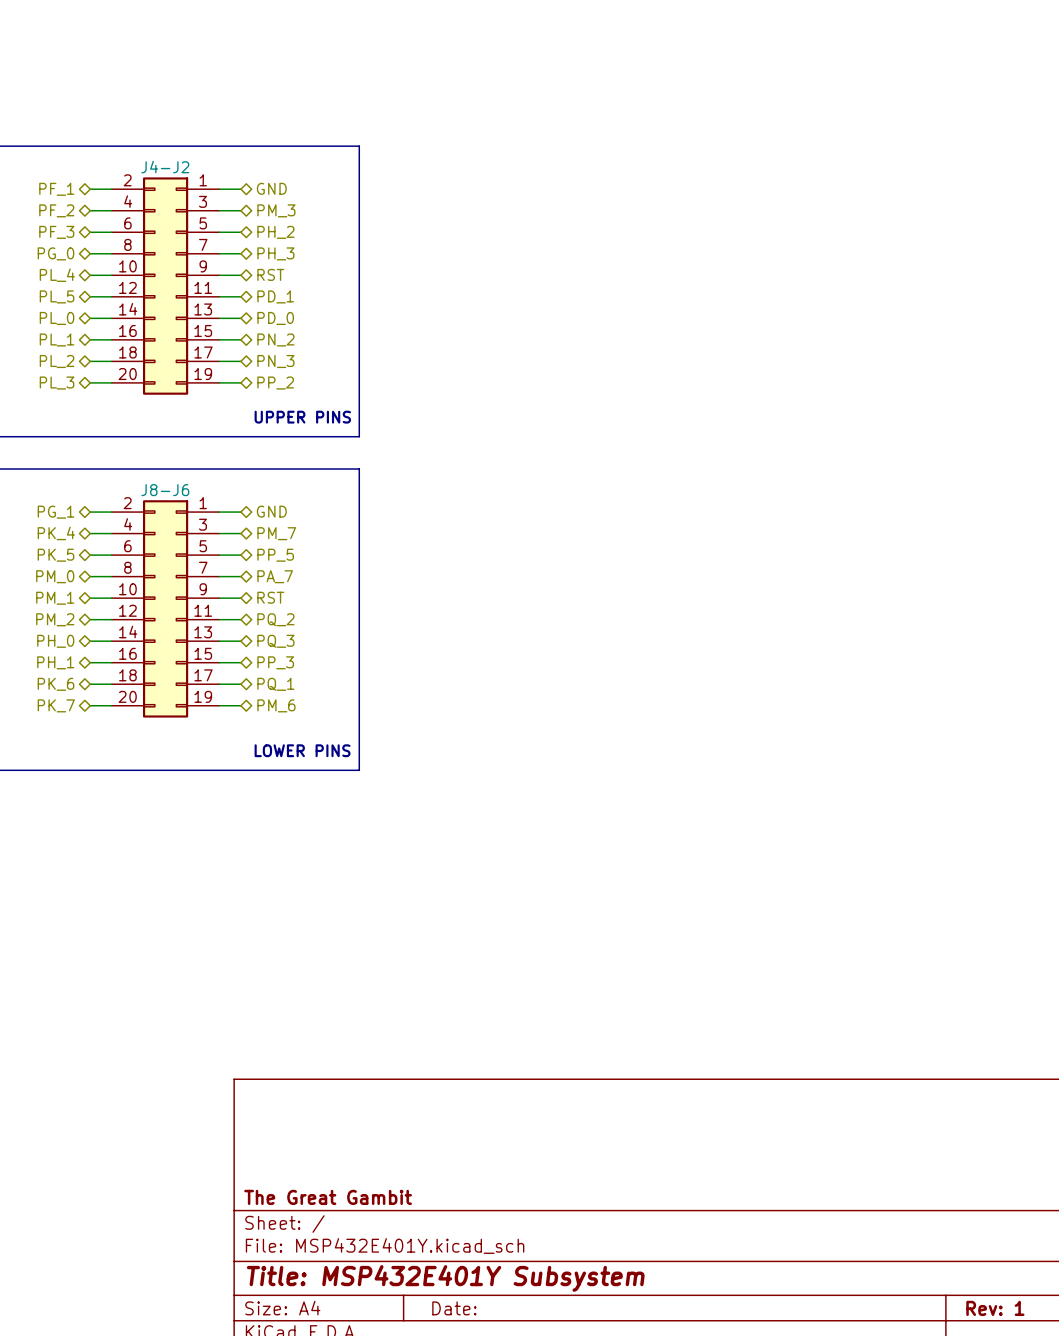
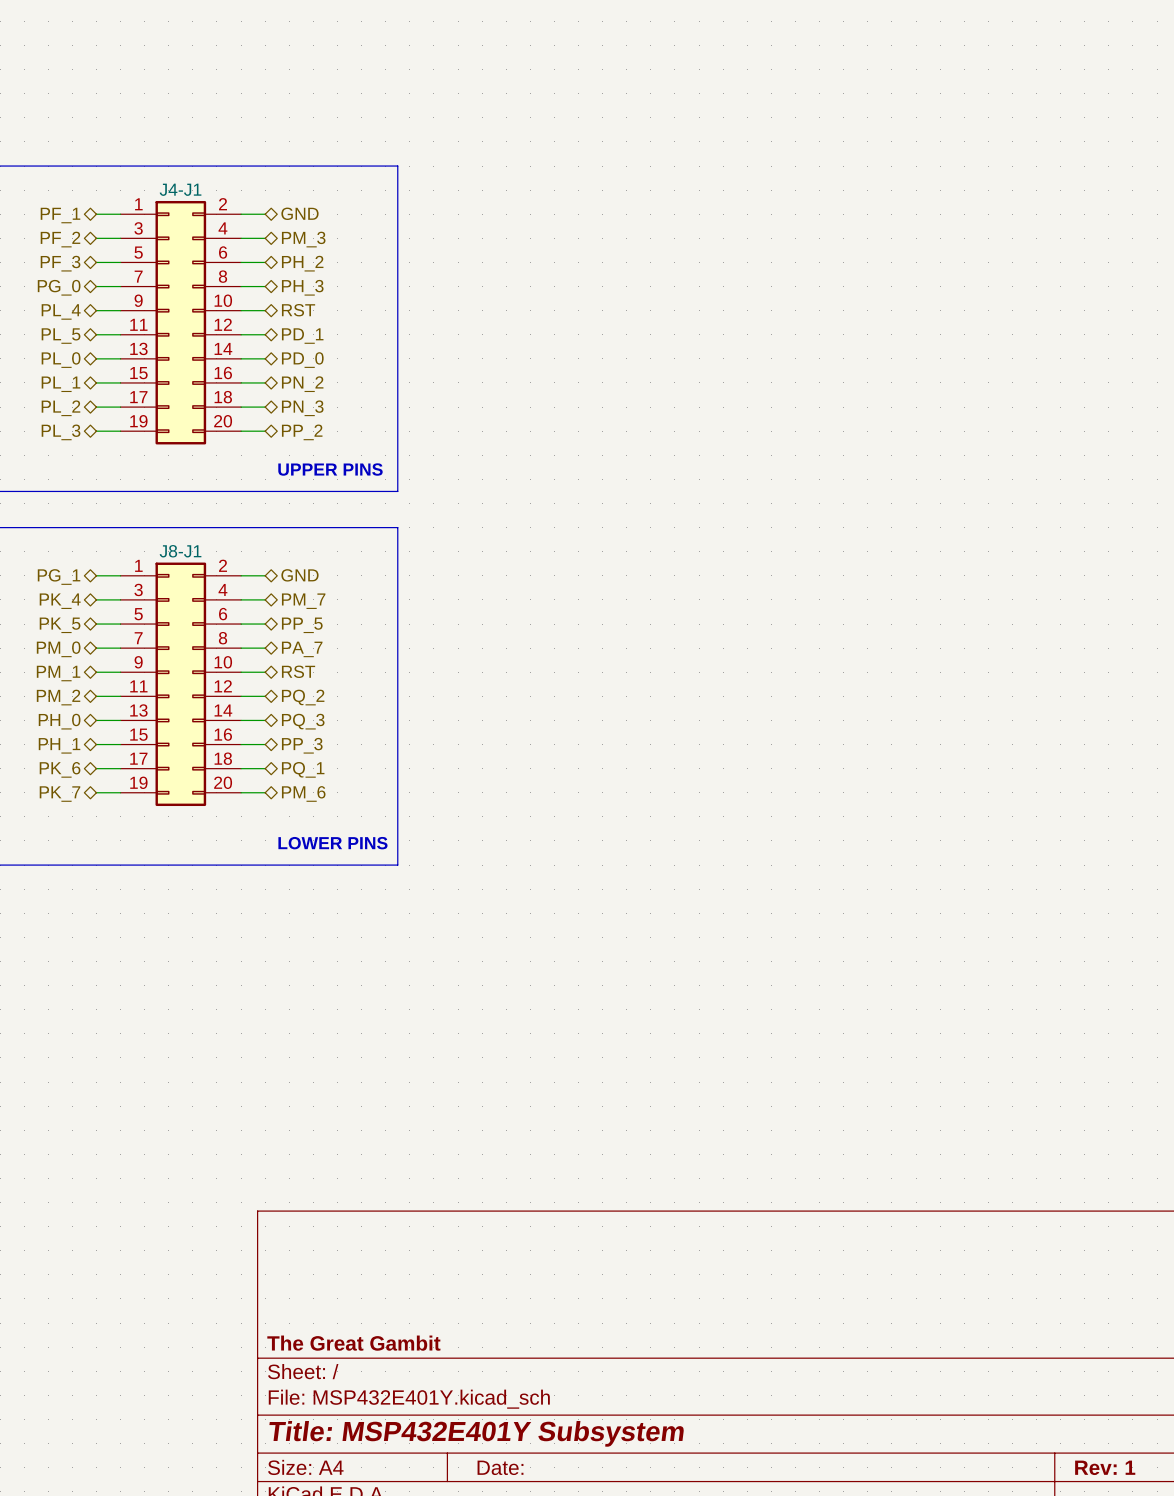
J4-J2 name: J4-J2 (165, 167) -> J4-J1 (180, 189)
J4-J2 flip: as is (165, 286) -> left-right (180, 322)
J8-J6 name: J8-J6 (165, 490) -> J8-J1 (180, 551)
J8-J6 flip: as is (165, 608) -> left-right (180, 684)

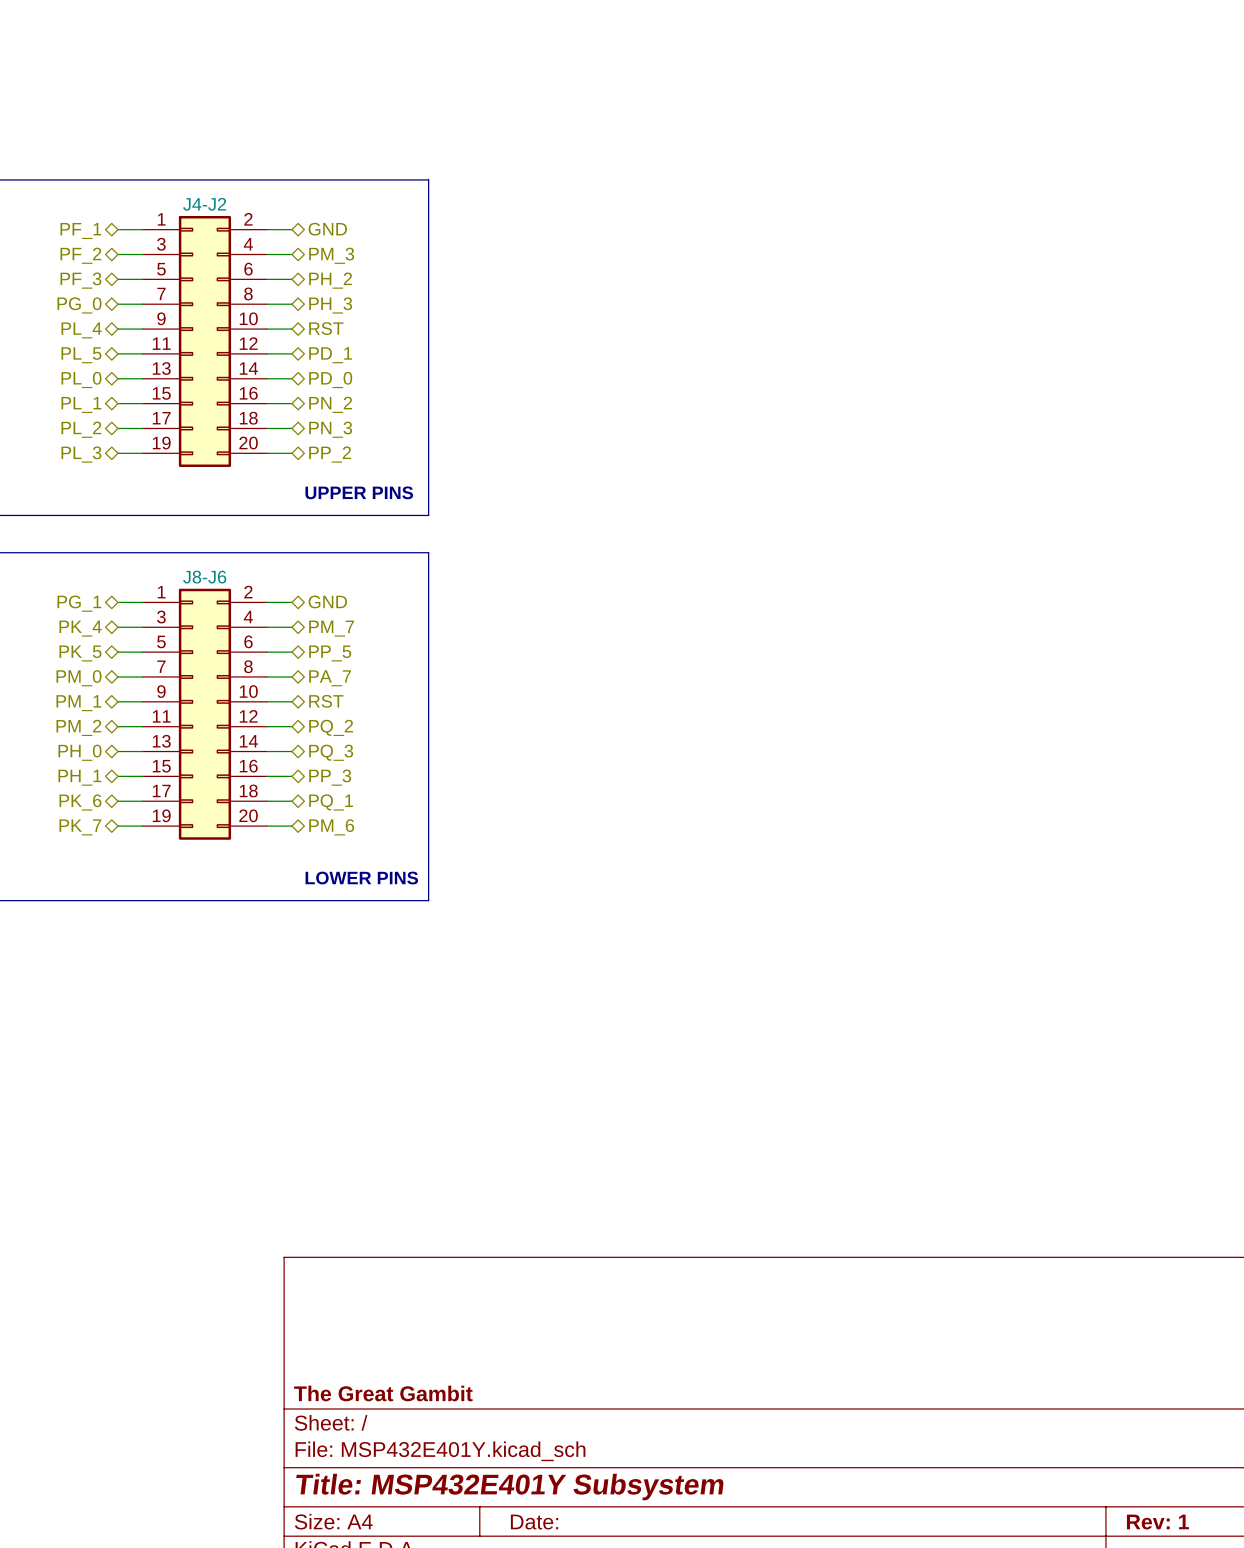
J4-J1 name: J4-J1 (180, 189) -> J4-J2 (204, 204)
J8-J1 name: J8-J1 (180, 551) -> J8-J6 (204, 577)

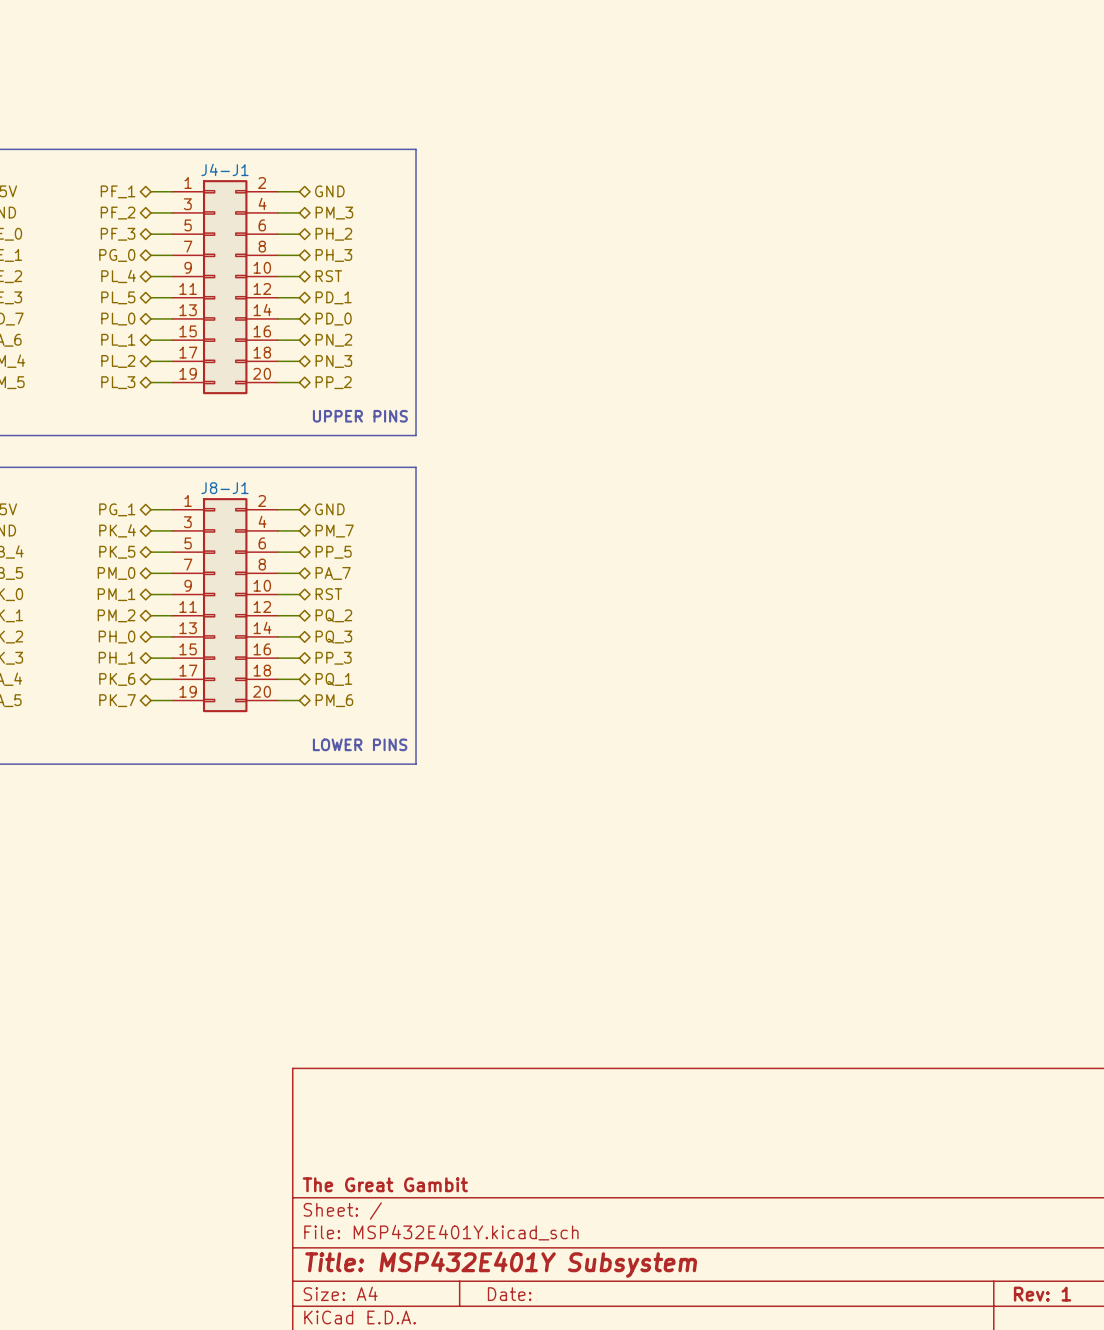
J4-J2 name: J4-J2 (204, 204) -> J4-J1 (224, 169)
J8-J6 name: J8-J6 (204, 577) -> J8-J1 (224, 488)

